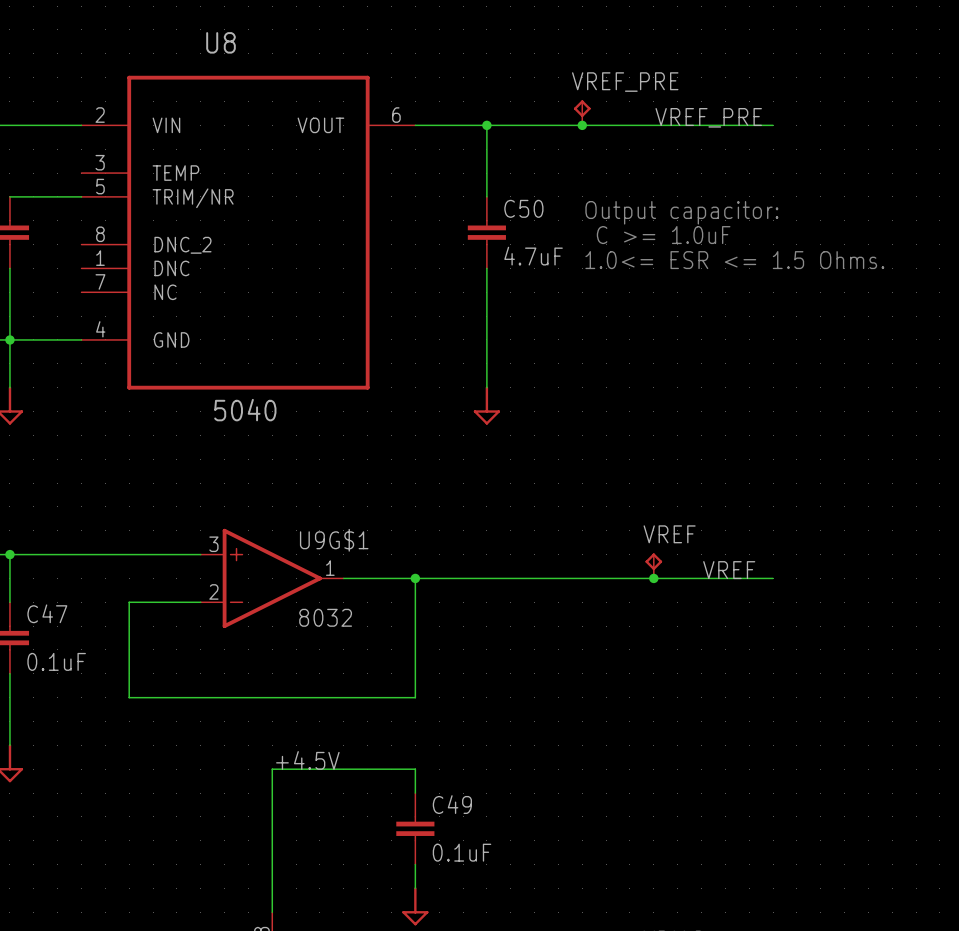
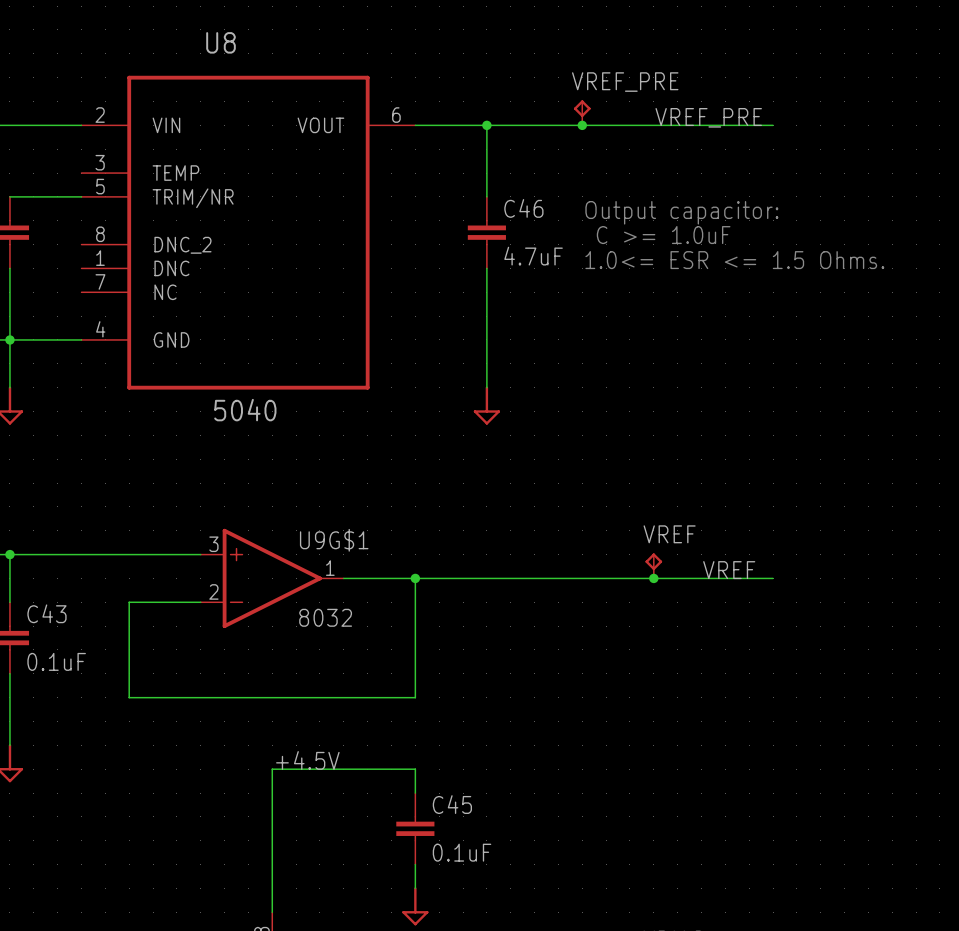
C50 name: C50 (523, 208) -> C46 (523, 208)
C47 name: C47 (47, 613) -> C43 (46, 613)
C49 name: C49 (452, 804) -> C45 (452, 804)

